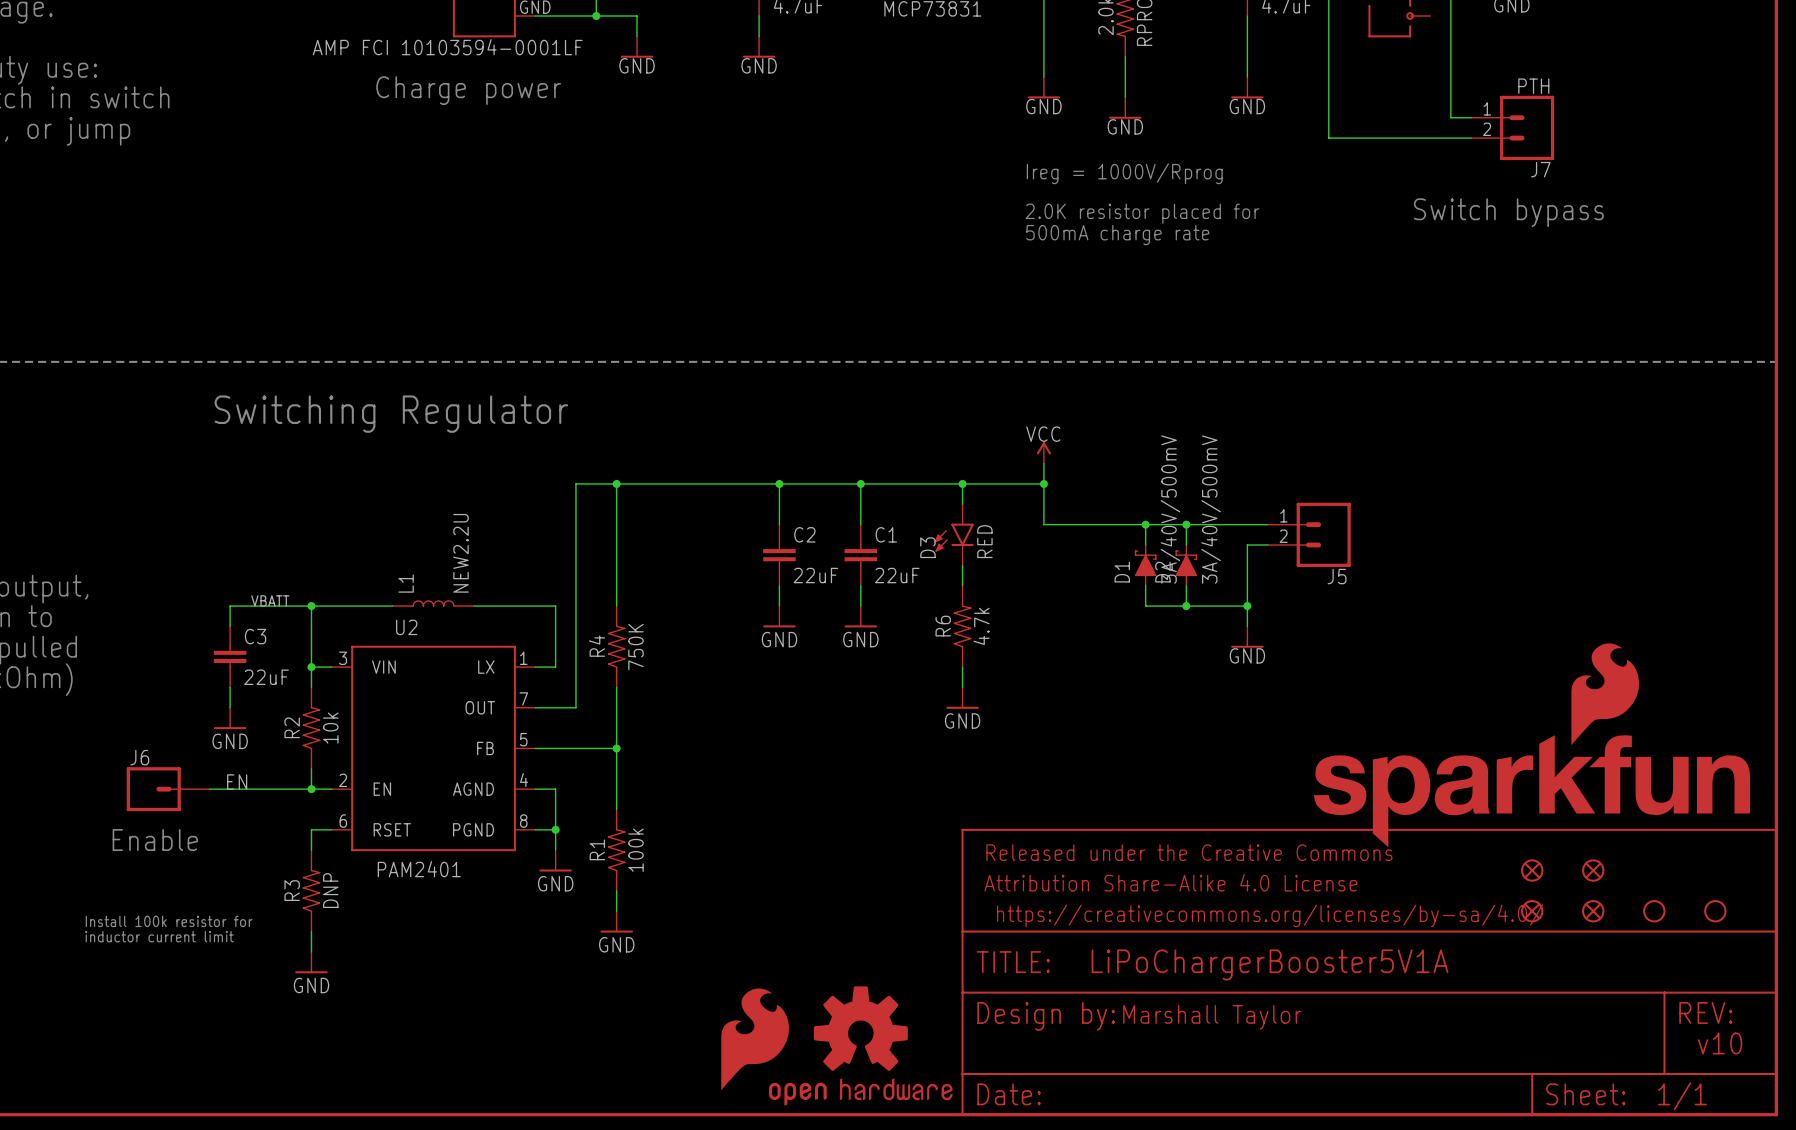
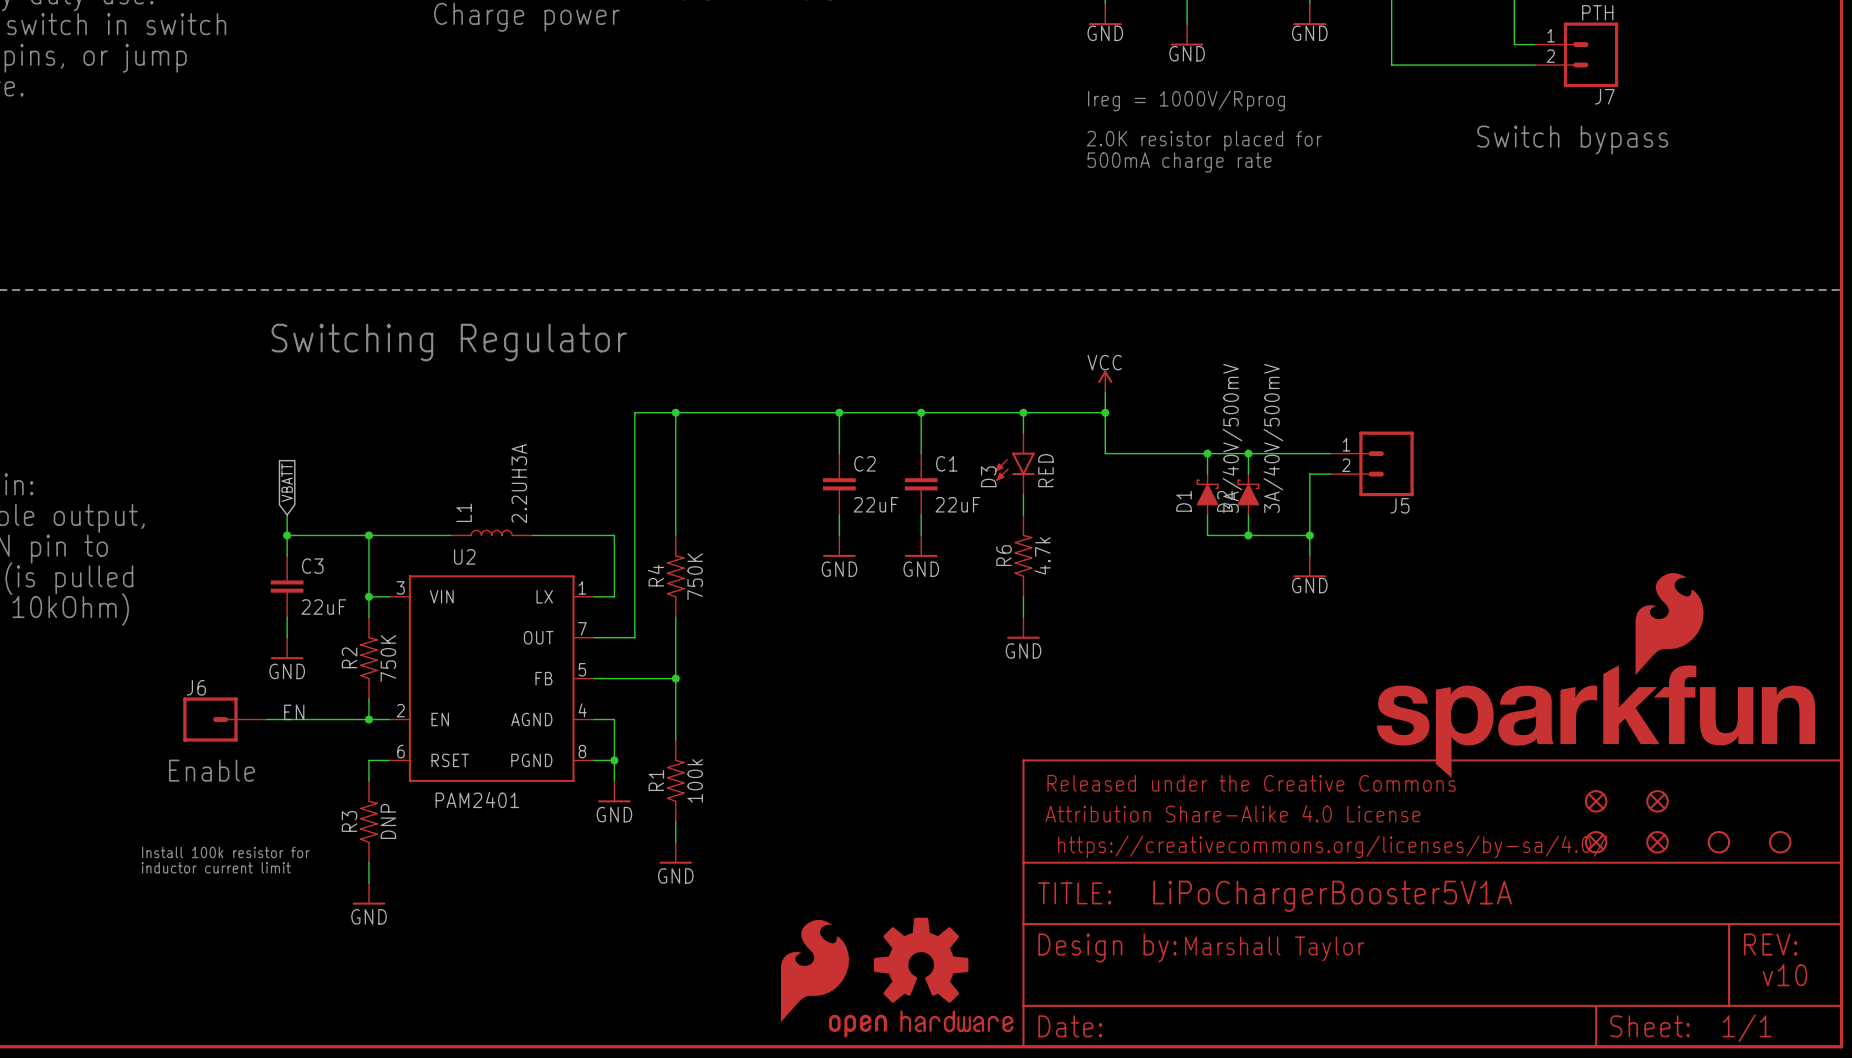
global label: none -> VBATT (287, 482)
L1 value: NEW2.2U (461, 553) -> 2.2UH3A (519, 483)
wire: none -> (287, 514) (287, 535)
label: VBATT (270, 600) -> none
junction: none -> (287, 535)
R2 value: 10k (330, 728) -> 750K (388, 658)

